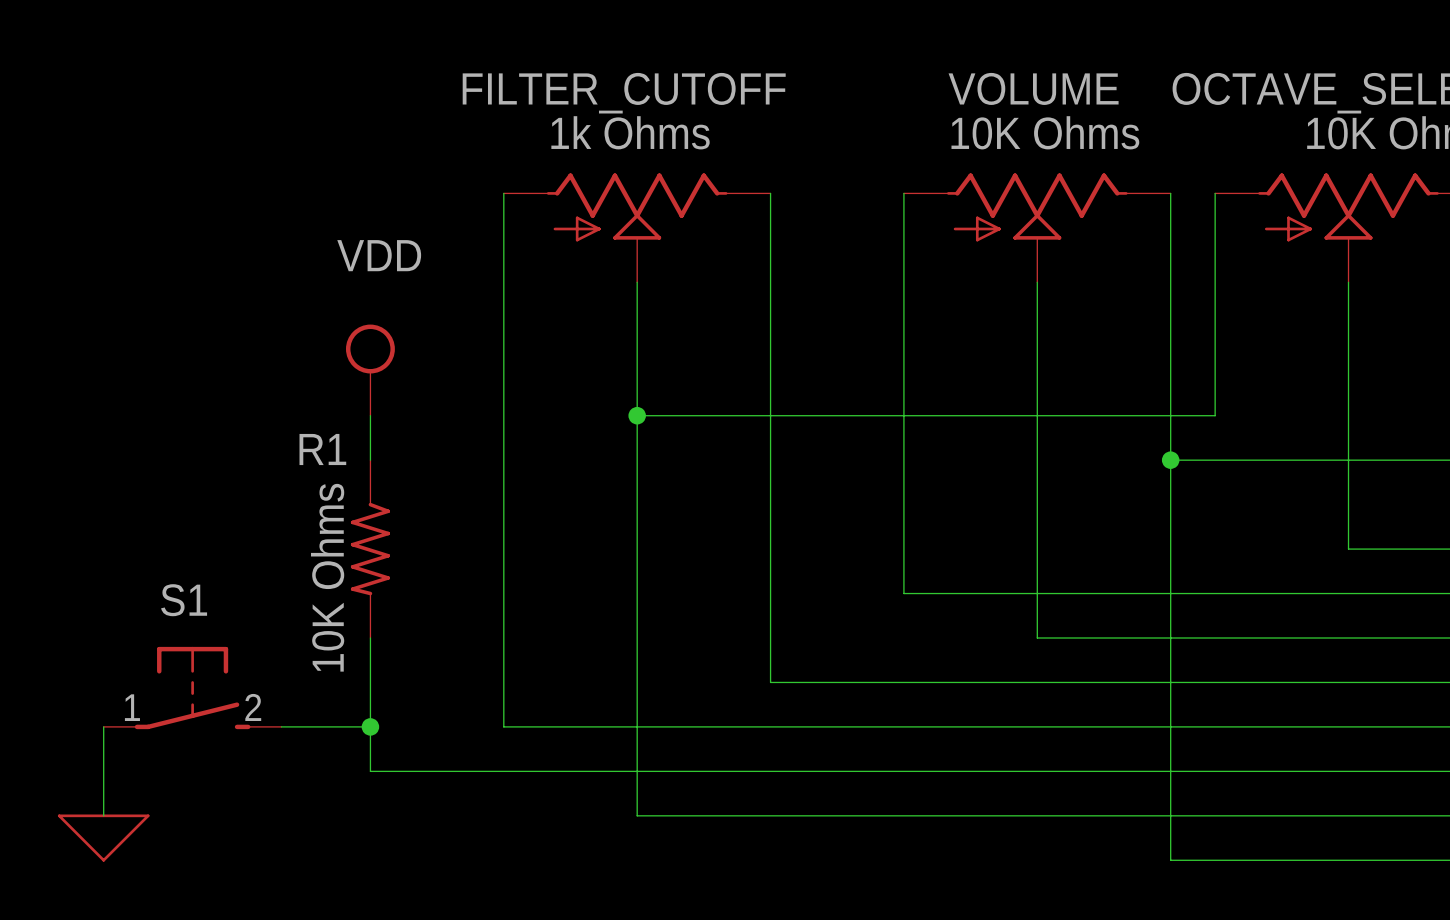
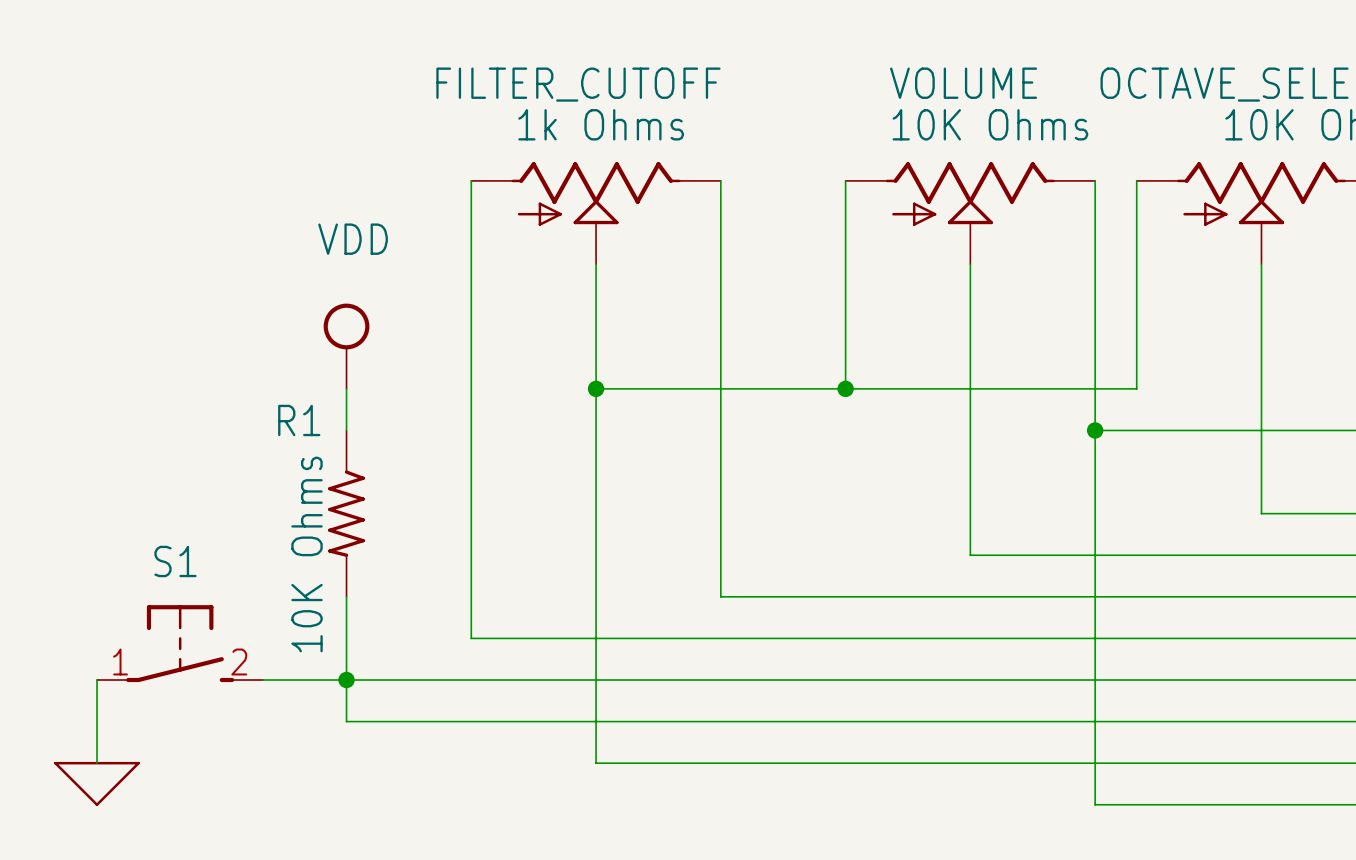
wire: (903, 415) (903, 593) (1037, 593) (1037, 638) -> (720, 596) (970, 596)
junction: none -> (845, 388)
wire: (770, 638) (770, 682) -> (471, 638) (720, 638)
wire: (503, 682) (503, 726) -> (346, 680) (471, 680)

